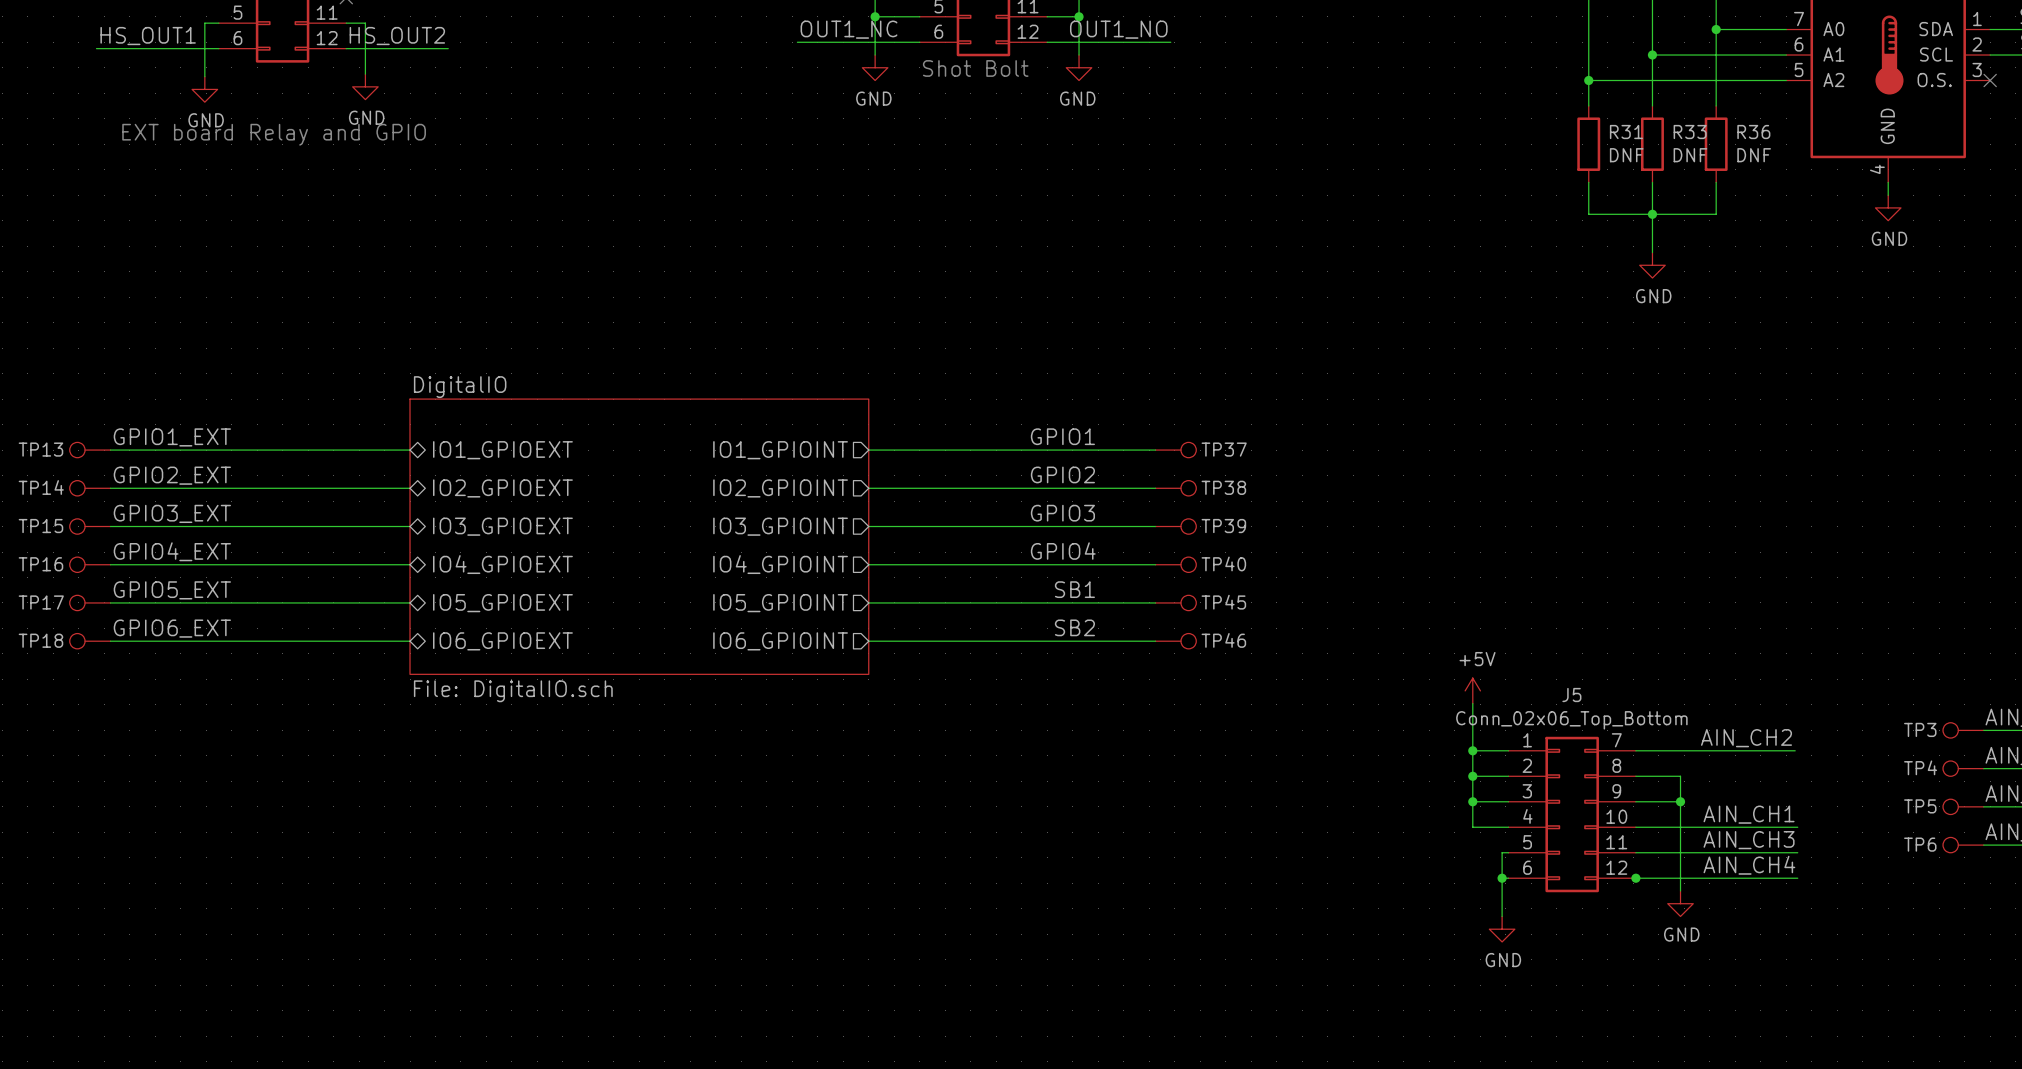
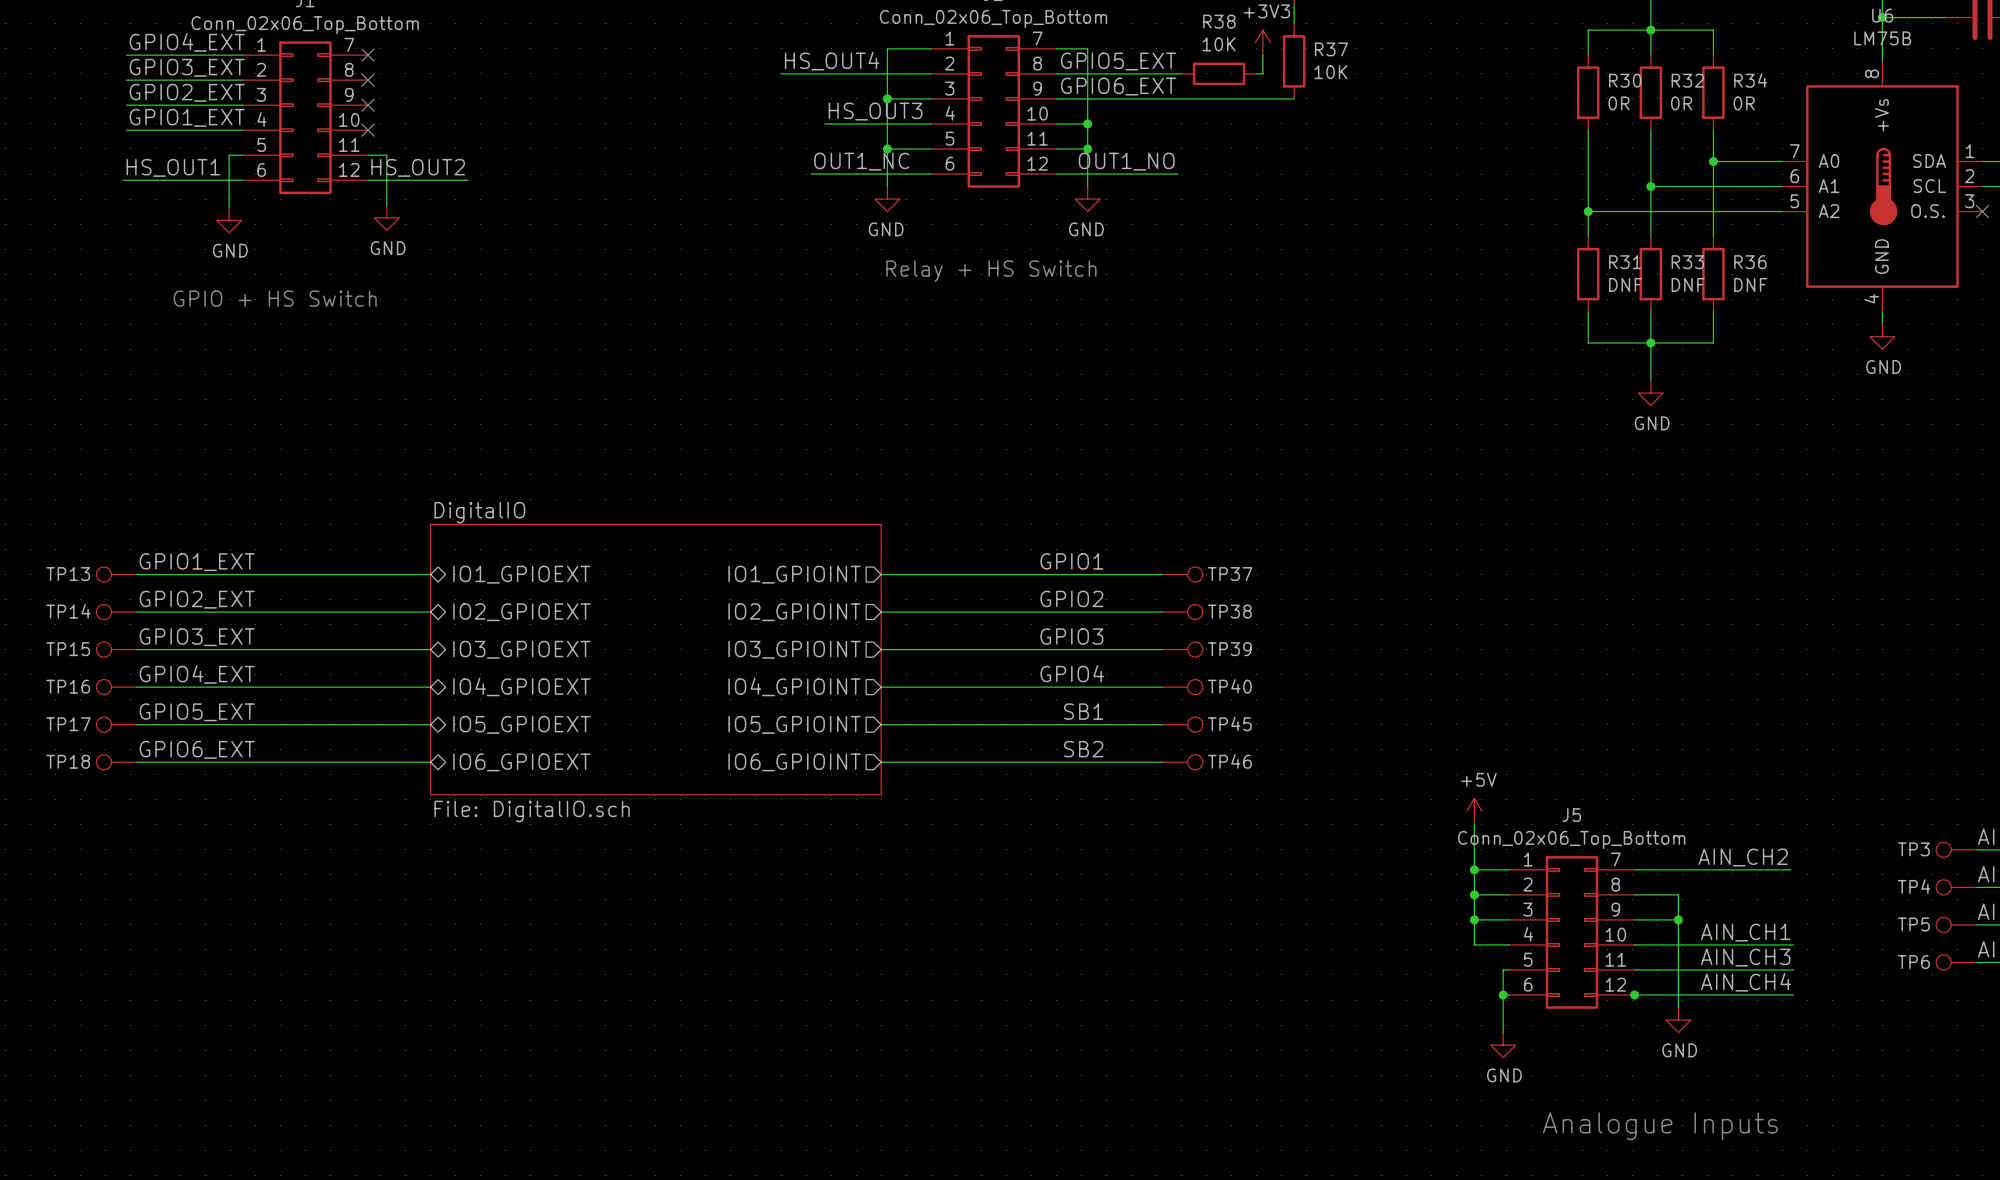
text: Shot Bolt (975, 68) -> none
text: EXT board Relay and GPIO (274, 134) -> none
text: none -> Relay + HS Switch (991, 271)
text: none -> GPIO + HS Switch (275, 298)
text: none -> Analogue Inputs (1660, 1126)

